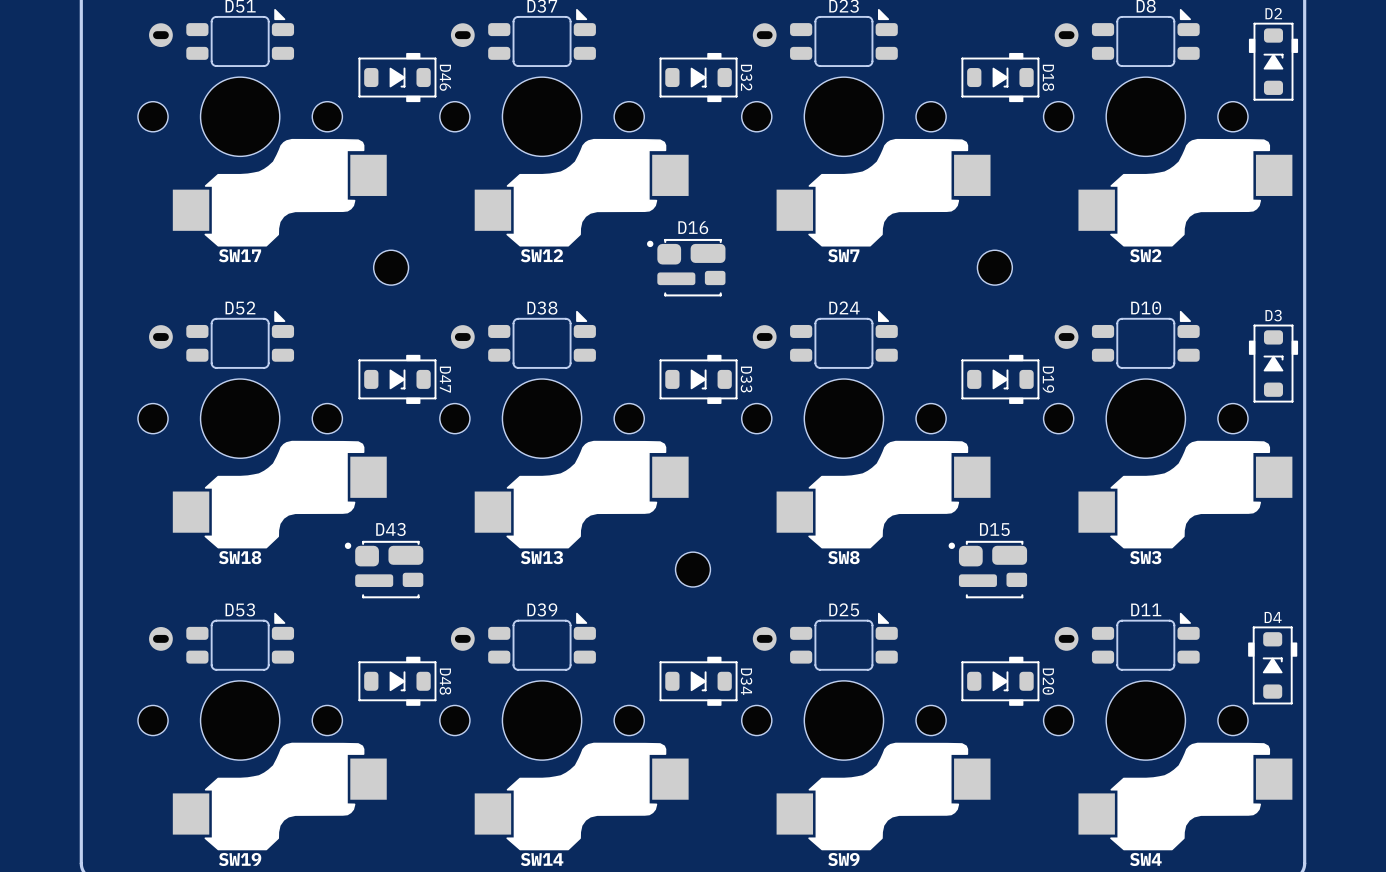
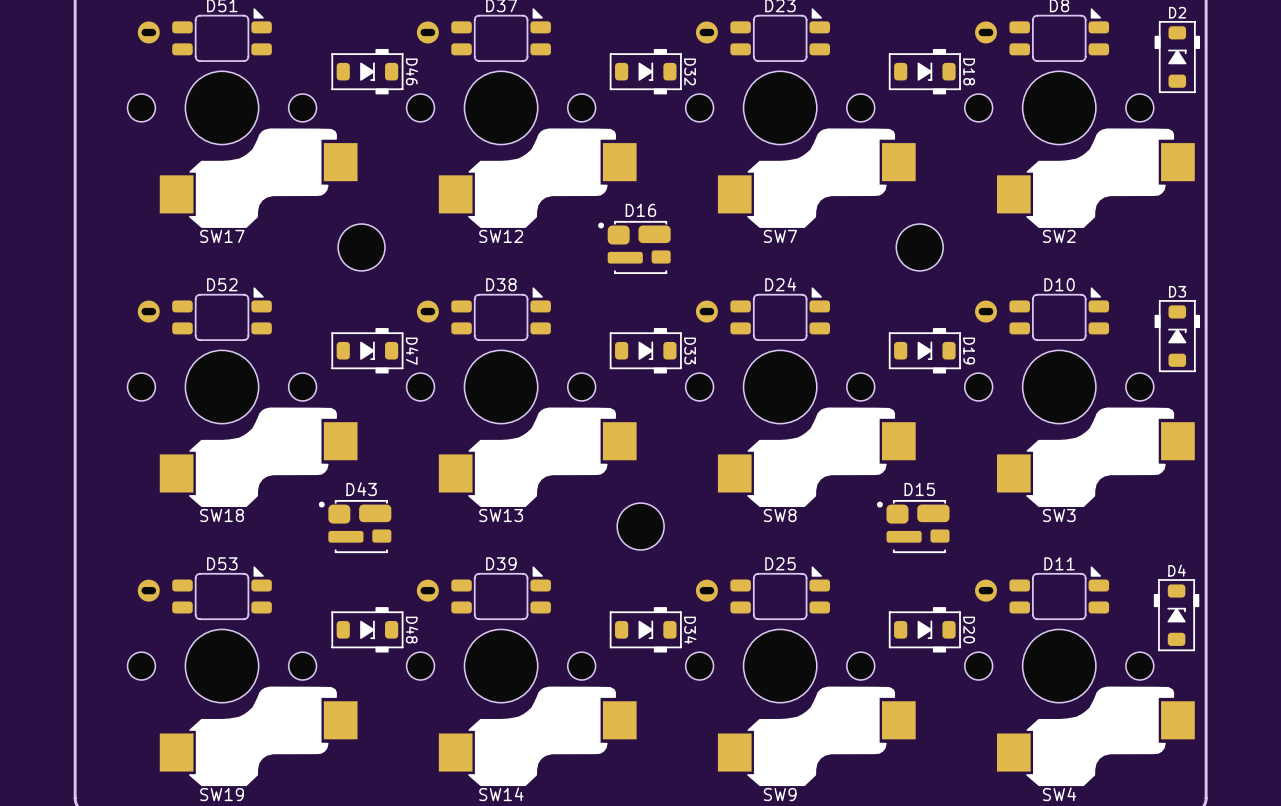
part footprint: [373, 250, 409, 286] -> [338, 224, 386, 271]
part footprint: [977, 250, 1013, 286] -> [896, 224, 944, 271]
part footprint: [675, 552, 711, 588] -> [617, 503, 665, 550]

